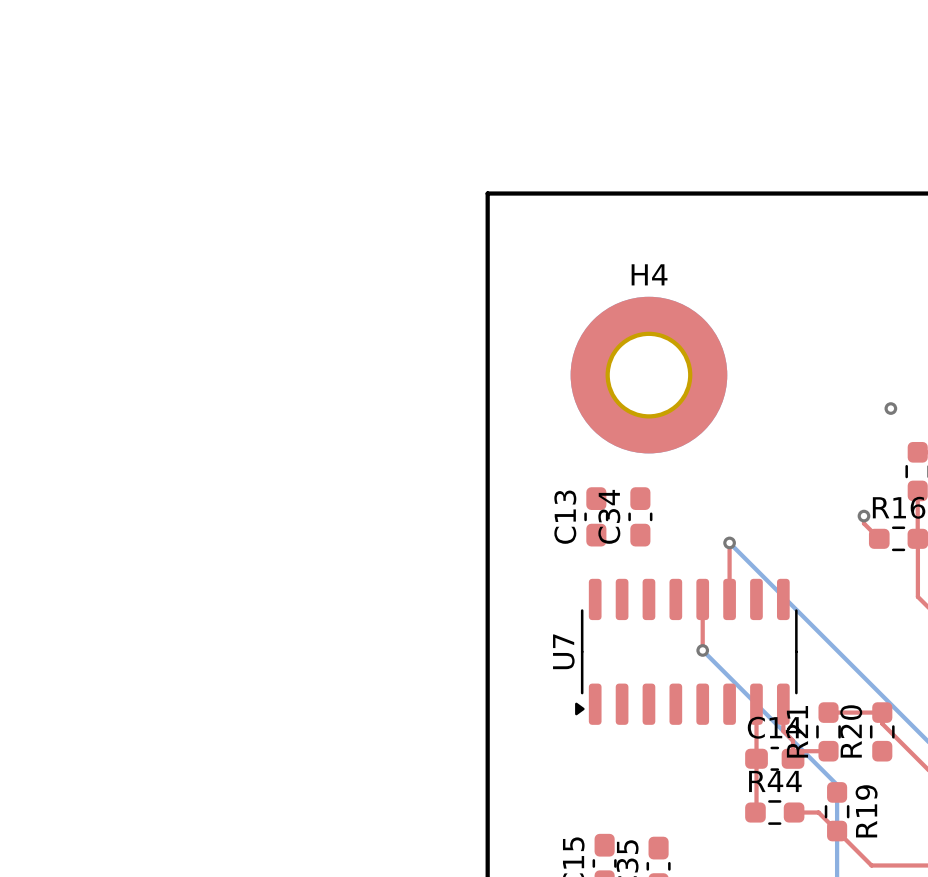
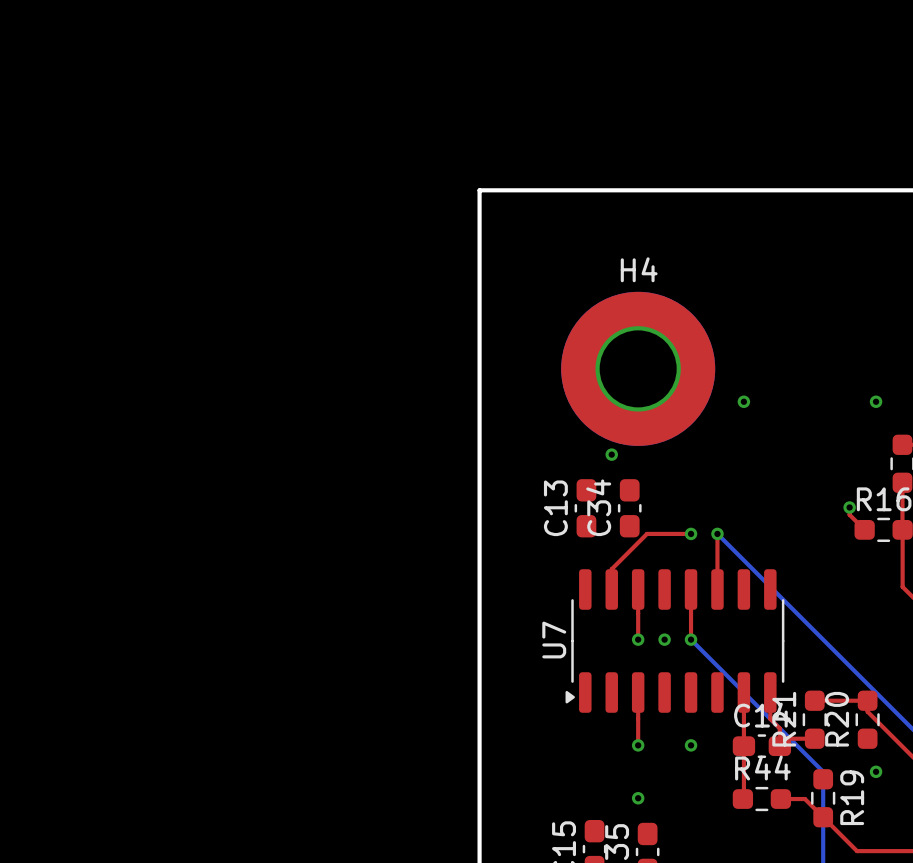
via: none -> (743, 401)
via: none -> (611, 454)
top track: none -> (691, 533) (647, 533) (611, 569) (611, 589)
via: none -> (691, 533)
top track: none -> (638, 589) (638, 639)
via: none -> (638, 639)
via: none -> (664, 639)
top track: none -> (638, 692) (638, 745)
via: none -> (638, 745)
via: none -> (691, 745)
via: none -> (876, 771)
via: none -> (638, 798)

